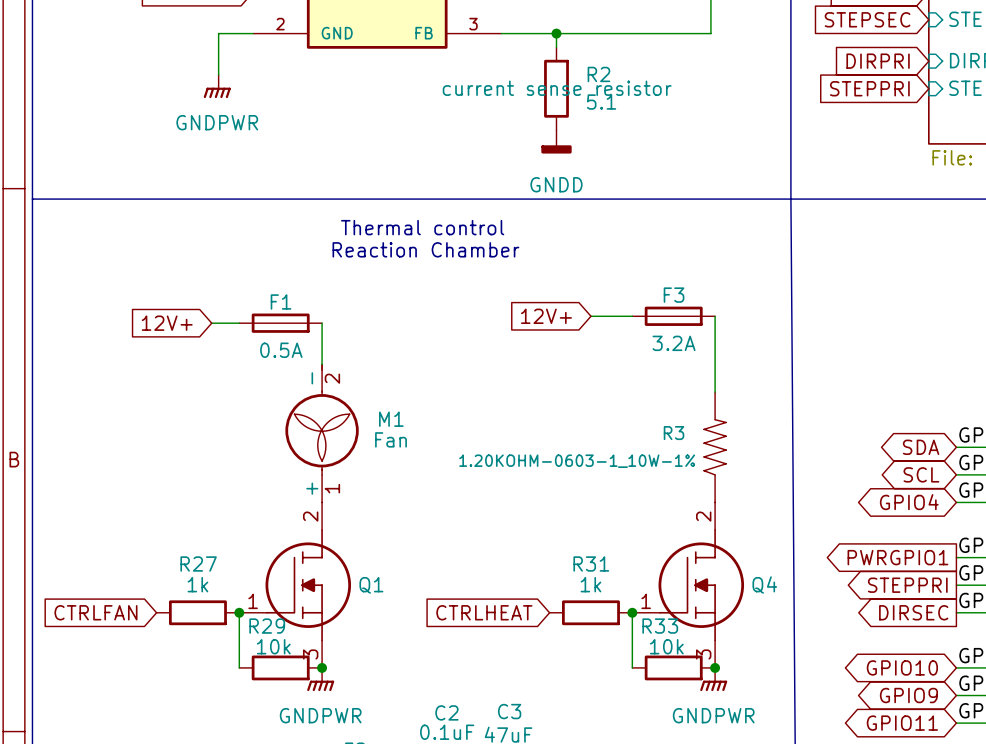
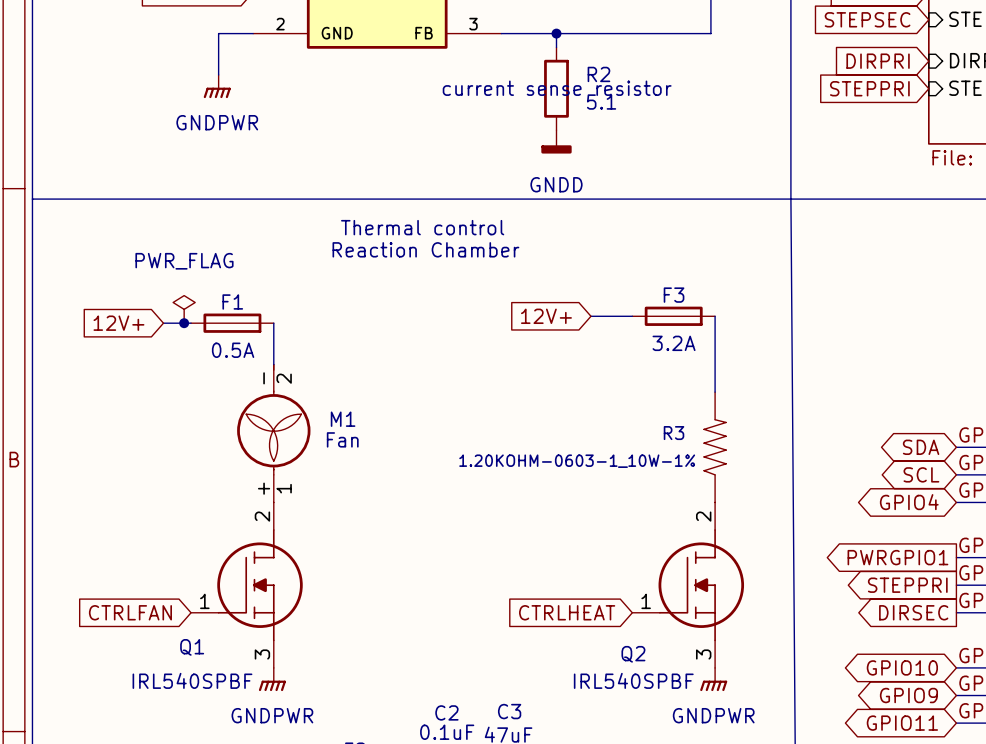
power symbol: none -> PWR_FLAG (184, 309)
global label position: 12V+ (167, 323) -> 12V+ (118, 323)
junction: none -> (184, 323)
F1 position: (280, 323) -> (232, 323)
wire: (322, 323) (322, 364) -> (273, 323) (273, 364)
M1 position: (322, 433) -> (273, 433)
Q1 position: (295, 585) -> (246, 585)
Q1 name position: Q1 (371, 585) -> Q1 (192, 647)
Q4 name: Q4 (764, 585) -> Q2 (633, 654)
global label position: CTRLFAN (95, 612) -> CTRLFAN (130, 612)
R27: 1k (197, 612) -> none
wire: (239, 612) (239, 667) -> none
junction: (239, 612) -> none
global label position: CTRLHEAT (484, 612) -> CTRLHEAT (567, 612)
R31: 1k (590, 612) -> none
wire: (632, 612) (632, 667) -> none
junction: (632, 612) -> none
R29: 10k (280, 667) -> none
junction: (322, 667) -> none
R33: 10k (673, 667) -> none
junction: (715, 667) -> none
power symbol position: GNDPWR (320, 679) -> GNDPWR (272, 679)
Q1 value: none -> IRL540SPBF (192, 680)
Q4 value: none -> IRL540SPBF (633, 680)

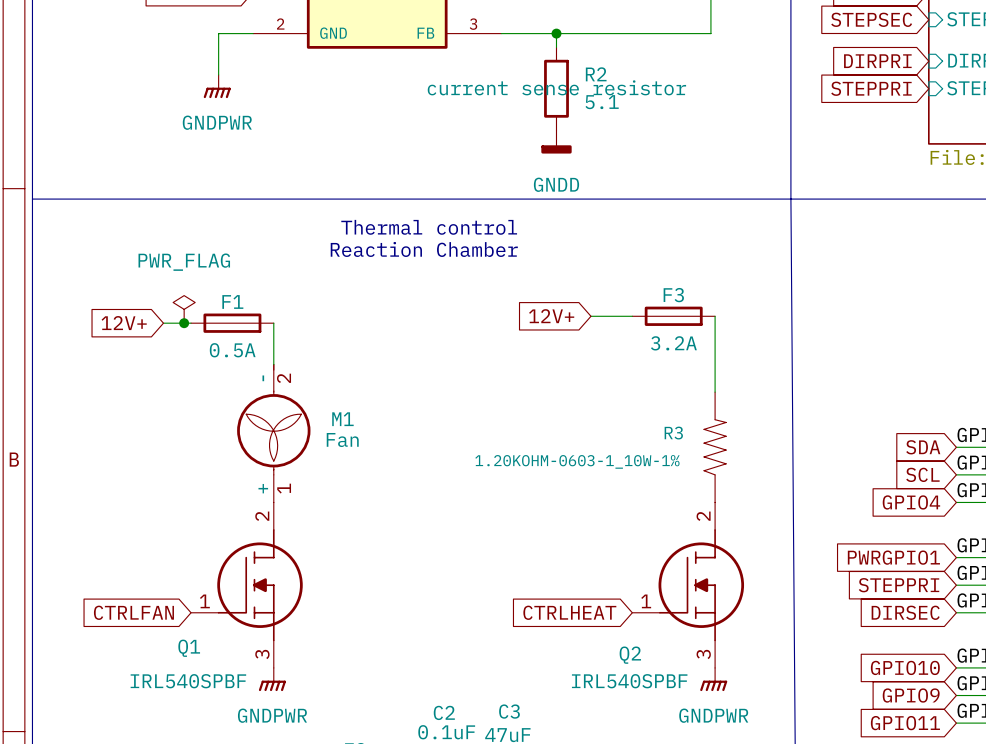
global label shape: bidirectional (921, 447) -> input (923, 447)
global label shape: bidirectional (921, 474) -> input (922, 474)
global label shape: bidirectional (909, 502) -> input (911, 502)
global label shape: output (897, 557) -> input (893, 557)
global label shape: output (907, 585) -> input (899, 585)
global label shape: output (913, 612) -> input (905, 612)
global label shape: bidirectional (902, 667) -> input (905, 667)
global label shape: bidirectional (908, 695) -> input (911, 695)
global label shape: bidirectional (902, 723) -> input (905, 723)

